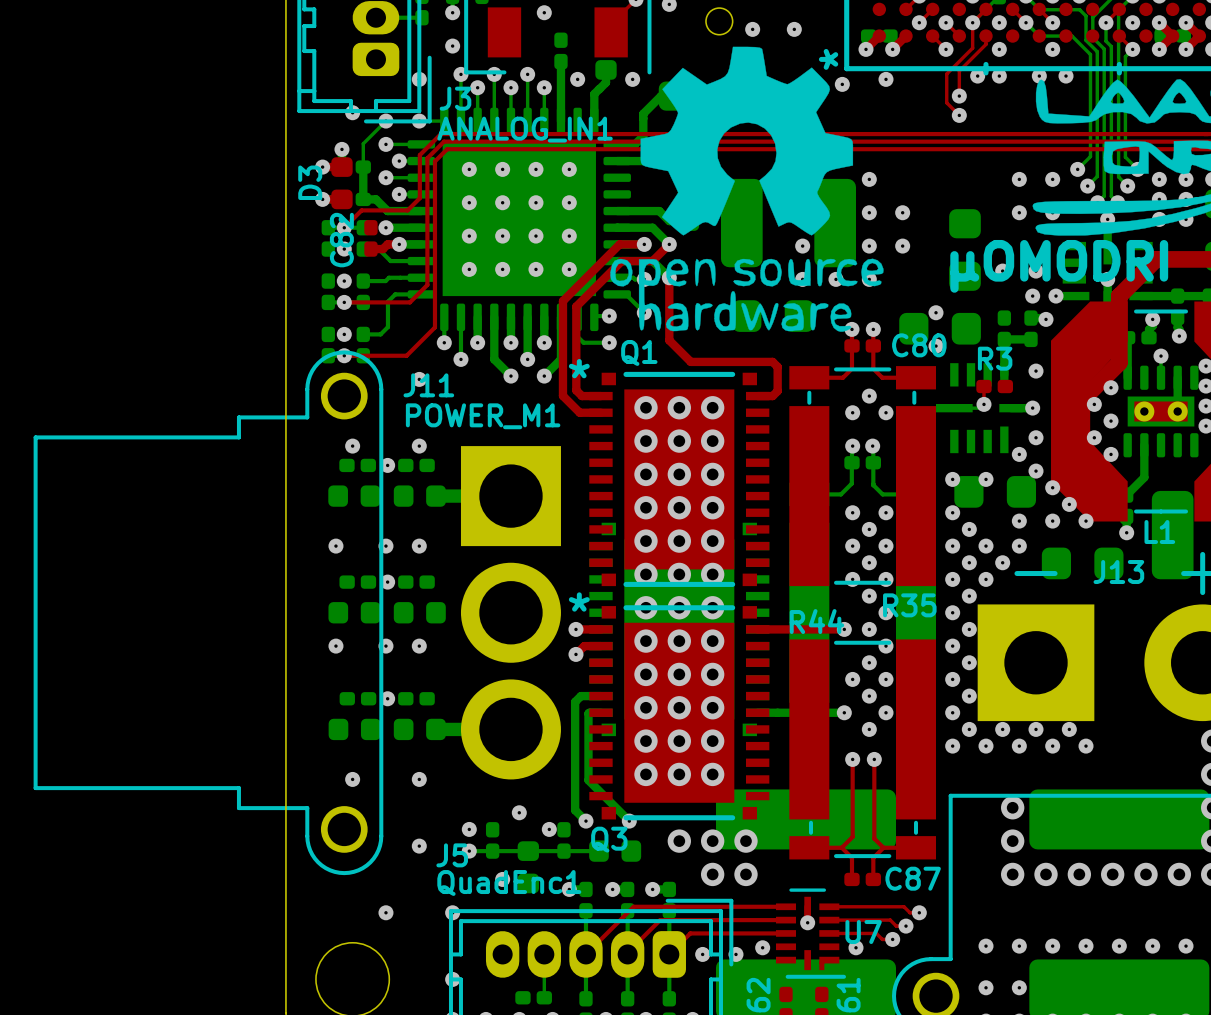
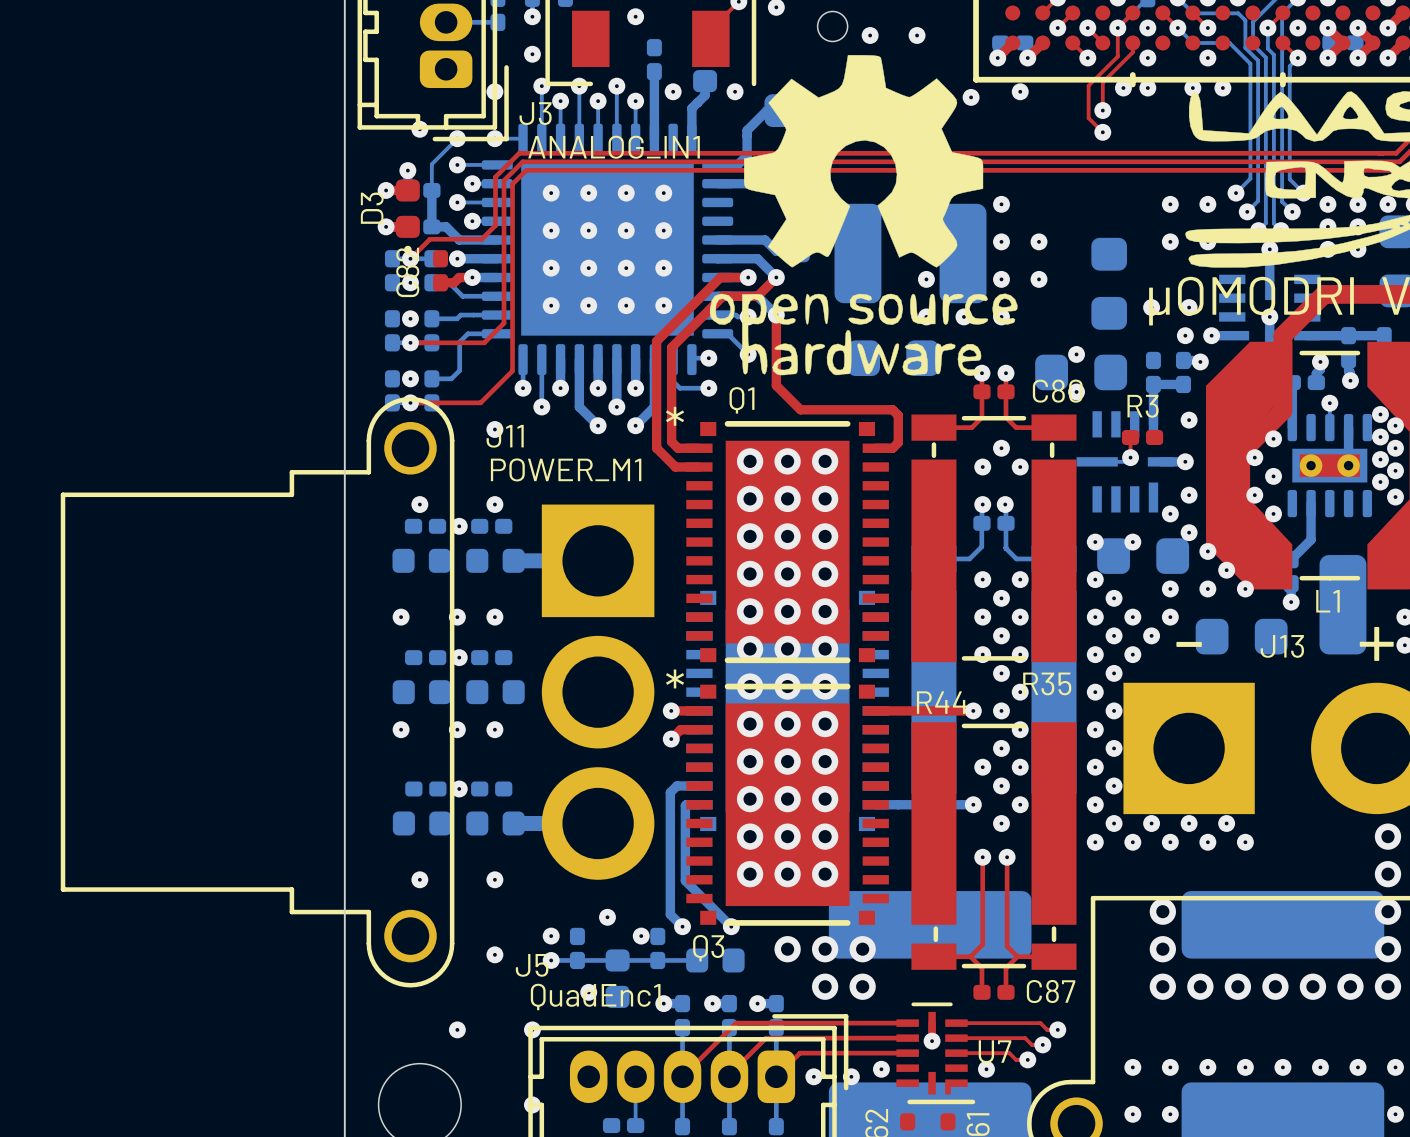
part text: * (828, 59) -> none

